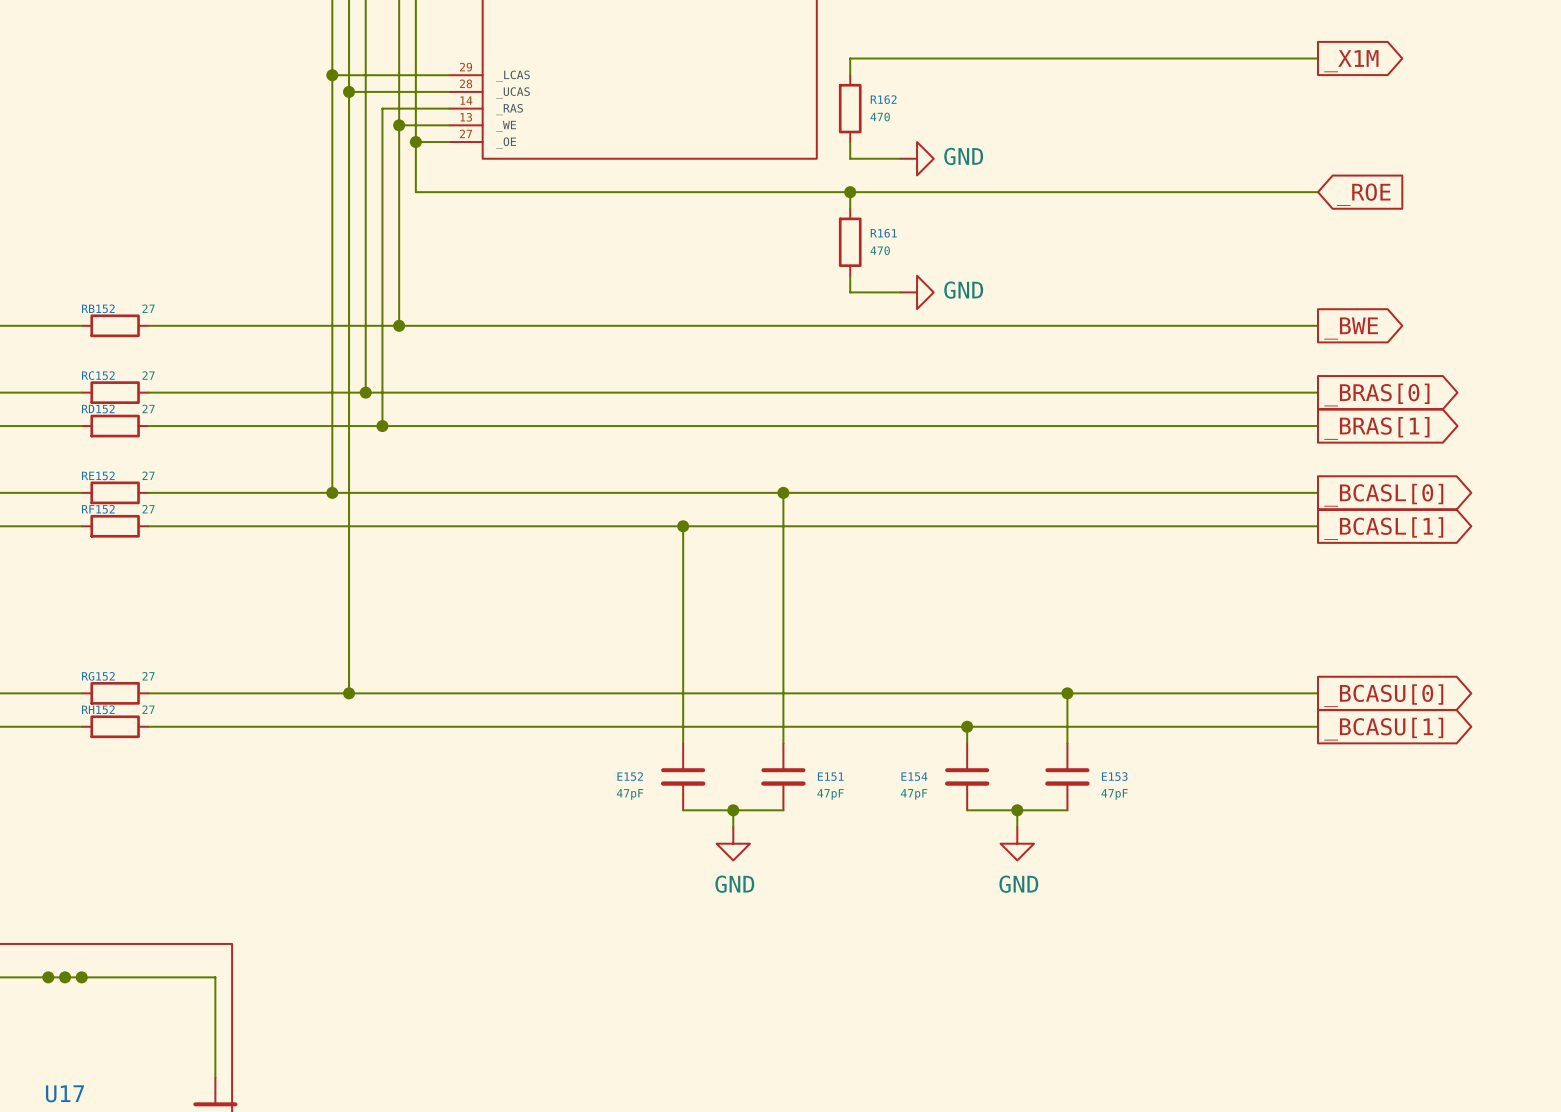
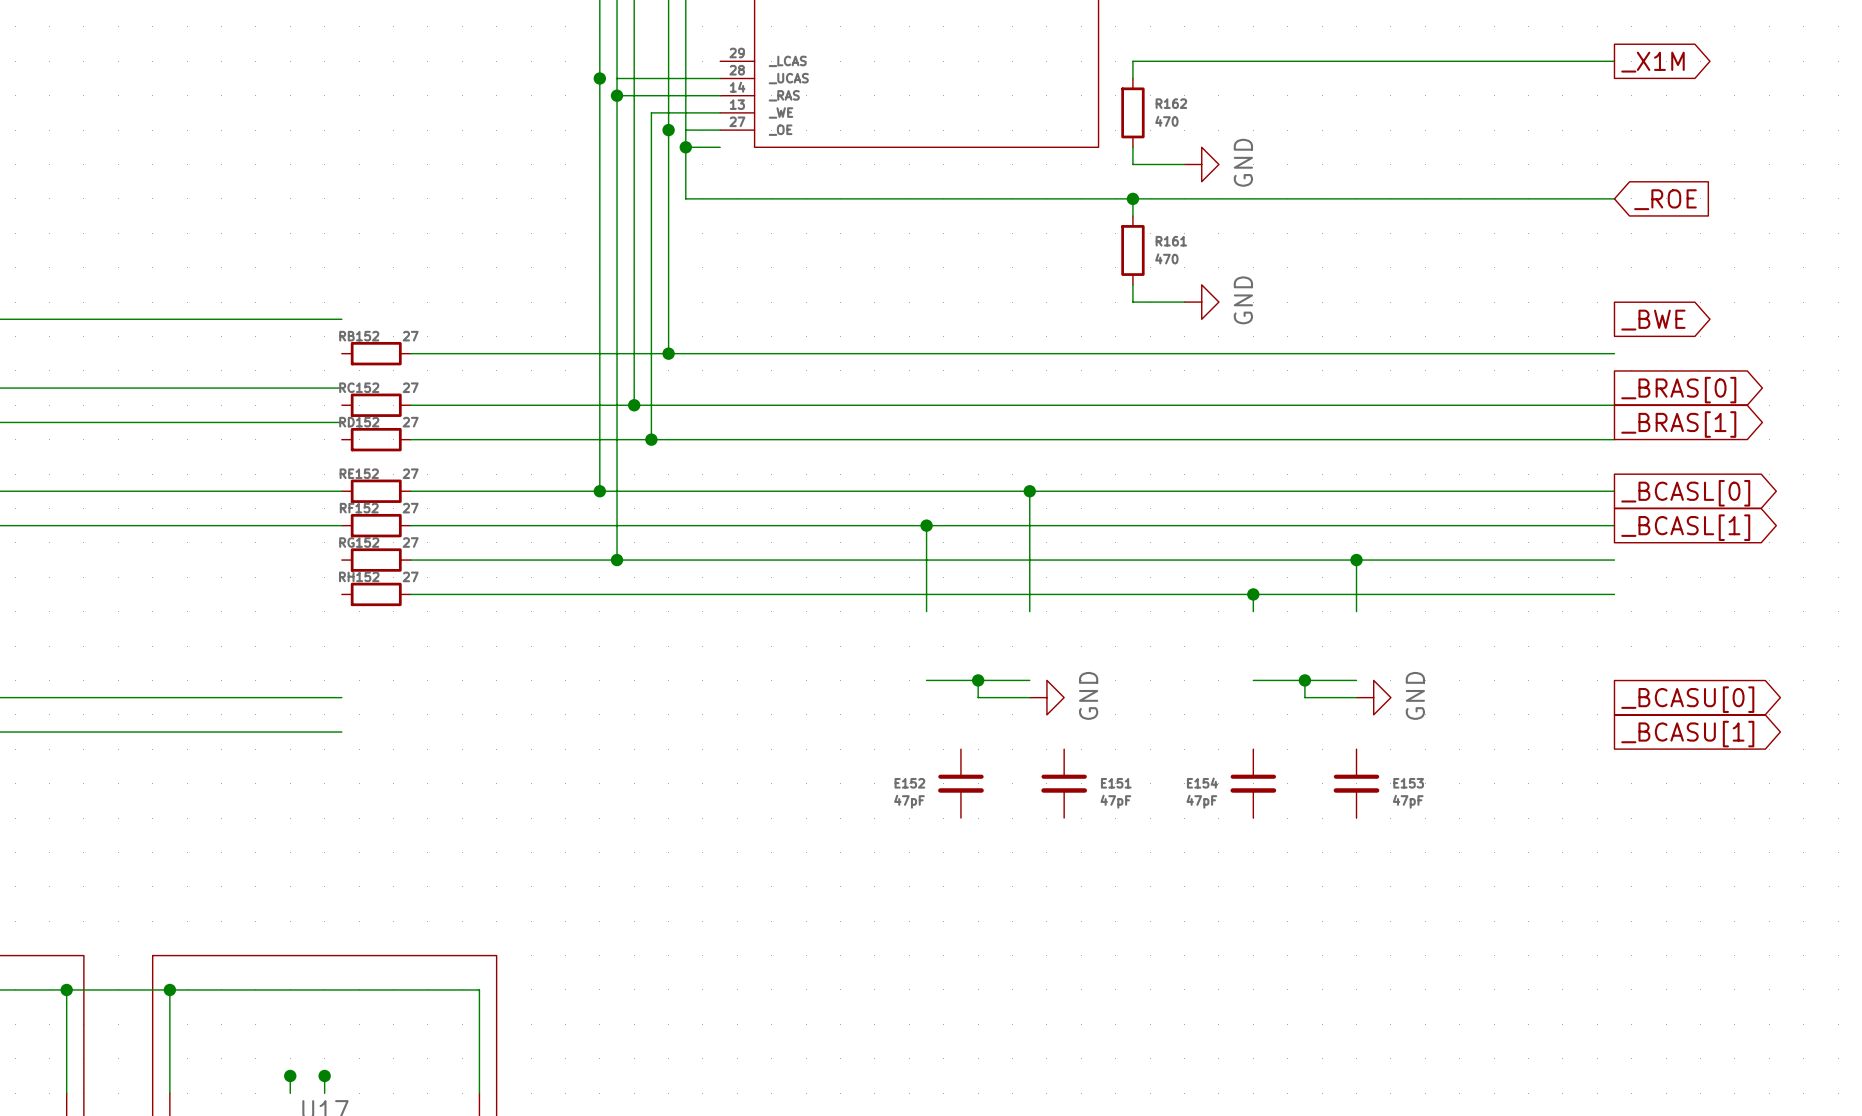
wire: (1318, 58) (850, 58) (850, 75) -> (1614, 61) (1132, 61) (1132, 78)
global label position: _X1M (1351, 61) -> _X1M (1652, 62)
wire: (332, 75) (449, 75) -> none
junction: (332, 75) -> none
junction: none -> (599, 78)
junction: (349, 91) -> none
wire: none -> (617, 95) (651, 95)
junction: none -> (617, 95)
wire: (382, 108) (382, 125) -> (668, 112) (651, 112)
R162 position: (850, 108) -> (1132, 112)
junction: (399, 125) -> none
junction: none -> (668, 130)
junction: (415, 142) -> none
wire: (850, 142) (850, 158) (900, 158) -> (1132, 147) (1132, 164) (1184, 164)
power symbol text rotation: 0° (963, 156) -> 90° counterclockwise (1243, 162)
wire: none -> (685, 147) (720, 147)
junction: none -> (685, 147)
power symbol position: GND (917, 158) -> GND (1201, 164)
wire: (415, 192) (1318, 192) -> (685, 181) (685, 198) (1614, 198)
junction position: (850, 192) -> (1132, 198)
global label position: _ROE (1363, 194) -> _ROE (1665, 199)
R161 position: (850, 242) -> (1132, 250)
wire: (850, 275) (850, 292) (900, 292) -> (1132, 284) (1132, 302) (1184, 302)
power symbol text rotation: 0° (963, 290) -> 90° counterclockwise (1243, 300)
power symbol position: GND (917, 292) -> GND (1201, 302)
RB152 position: (115, 325) -> (376, 353)
wire: (148, 325) (1318, 325) -> (410, 353) (1614, 353)
wire: none -> (668, 319) (668, 353)
junction: (399, 325) -> none
junction: none -> (668, 353)
RC152 position: (115, 392) -> (376, 405)
wire: (148, 392) (1318, 392) -> (410, 405) (1614, 405)
wire: none -> (634, 388) (634, 405)
junction: (365, 392) -> none
junction: none -> (634, 405)
RD152 position: (115, 426) -> (376, 439)
wire: (148, 426) (1318, 426) -> (410, 439) (1614, 439)
wire: none -> (651, 422) (651, 439)
junction: (382, 426) -> none
junction: none -> (651, 439)
wire: none -> (1029, 491) (1029, 611)
wire: (783, 492) (783, 743) -> none
junction position: (783, 492) -> (1029, 491)
wire: none -> (926, 525) (926, 611)
wire: (683, 526) (683, 743) -> none
junction position: (683, 526) -> (926, 525)
wire: none -> (410, 560) (1614, 560)
wire: (349, 559) (349, 693) -> none
junction: none -> (617, 560)
wire: none -> (1356, 560) (1356, 611)
junction: none -> (1356, 560)
junction: none -> (1253, 594)
junction: none -> (978, 680)
junction: none -> (1304, 680)
RG152 position: (115, 693) -> (376, 560)
wire: (148, 693) (699, 693) -> (978, 680) (978, 697)
junction: (349, 693) -> none
wire: (749, 693) (1017, 693) -> (1304, 680) (1304, 697)
power symbol: none -> GND (1046, 697)
junction: (1067, 693) -> none
power symbol: none -> GND (1373, 697)
wire: (1318, 693) (1067, 693) (1067, 743) -> none
RH152 position: (115, 726) -> (376, 594)
wire: (148, 726) (1318, 726) -> (410, 594) (1614, 594)
wire: (967, 726) (967, 743) -> (1253, 594) (1253, 611)
junction: (967, 726) -> none
wire: (683, 810) (783, 810) -> (926, 680) (1029, 680)
wire: (733, 810) (733, 827) -> none
junction: (733, 810) -> none
wire: (967, 810) (1067, 810) -> (1253, 680) (1356, 680)
wire: (1017, 810) (1017, 827) -> none
junction: (1017, 810) -> none
power symbol: GND (733, 843) -> none
power symbol: GND (1017, 843) -> none
junction: (48, 977) -> none
junction: (65, 977) -> none
junction: (81, 977) -> none
wire: none -> (290, 1075) (290, 1093)
junction: none -> (290, 1075)
wire: none -> (324, 1075) (324, 1093)
junction: none -> (324, 1075)

